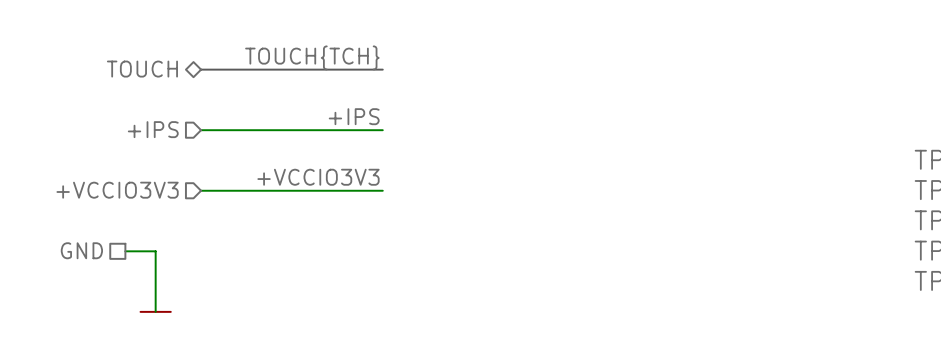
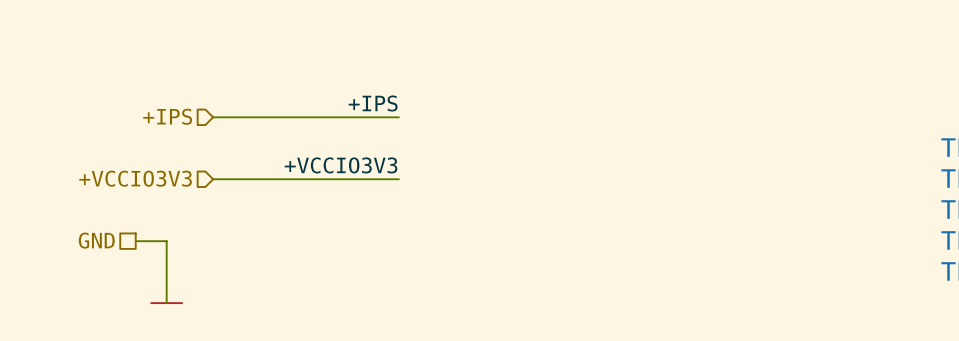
label: TOUCH{TCH} (312, 57) -> none
hierarchical label: TOUCH (142, 69) -> none
bus: (201, 69) (382, 69) -> none

